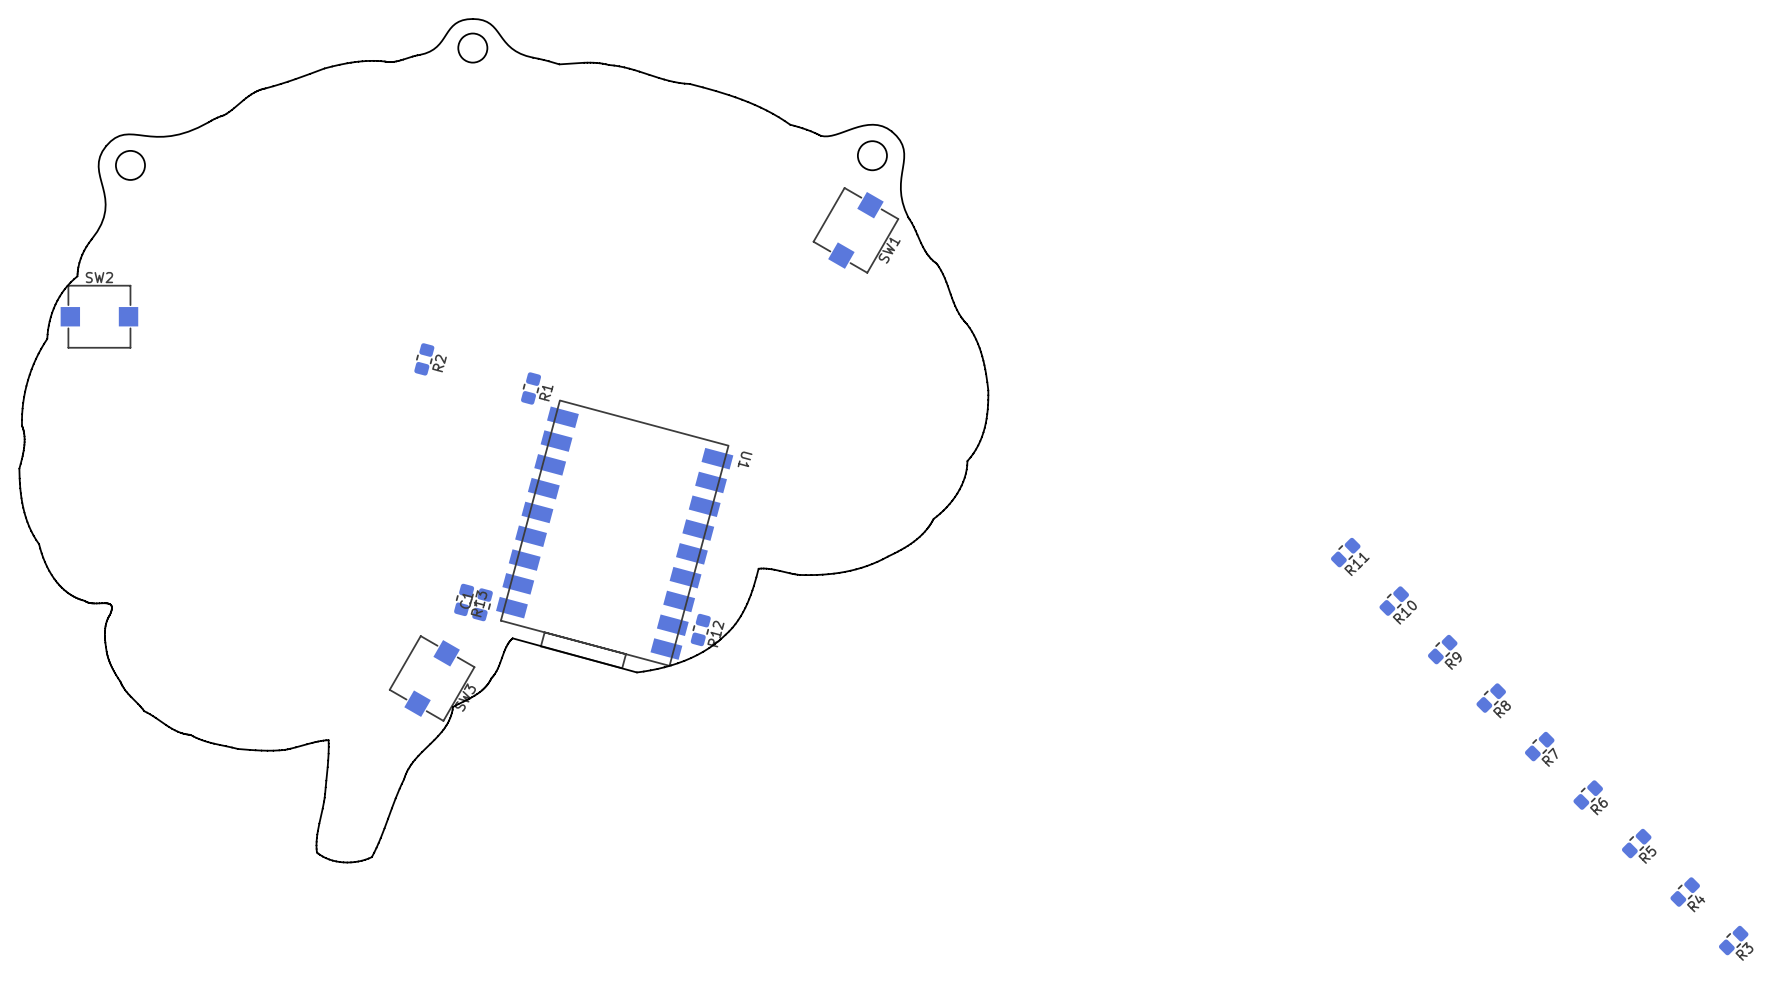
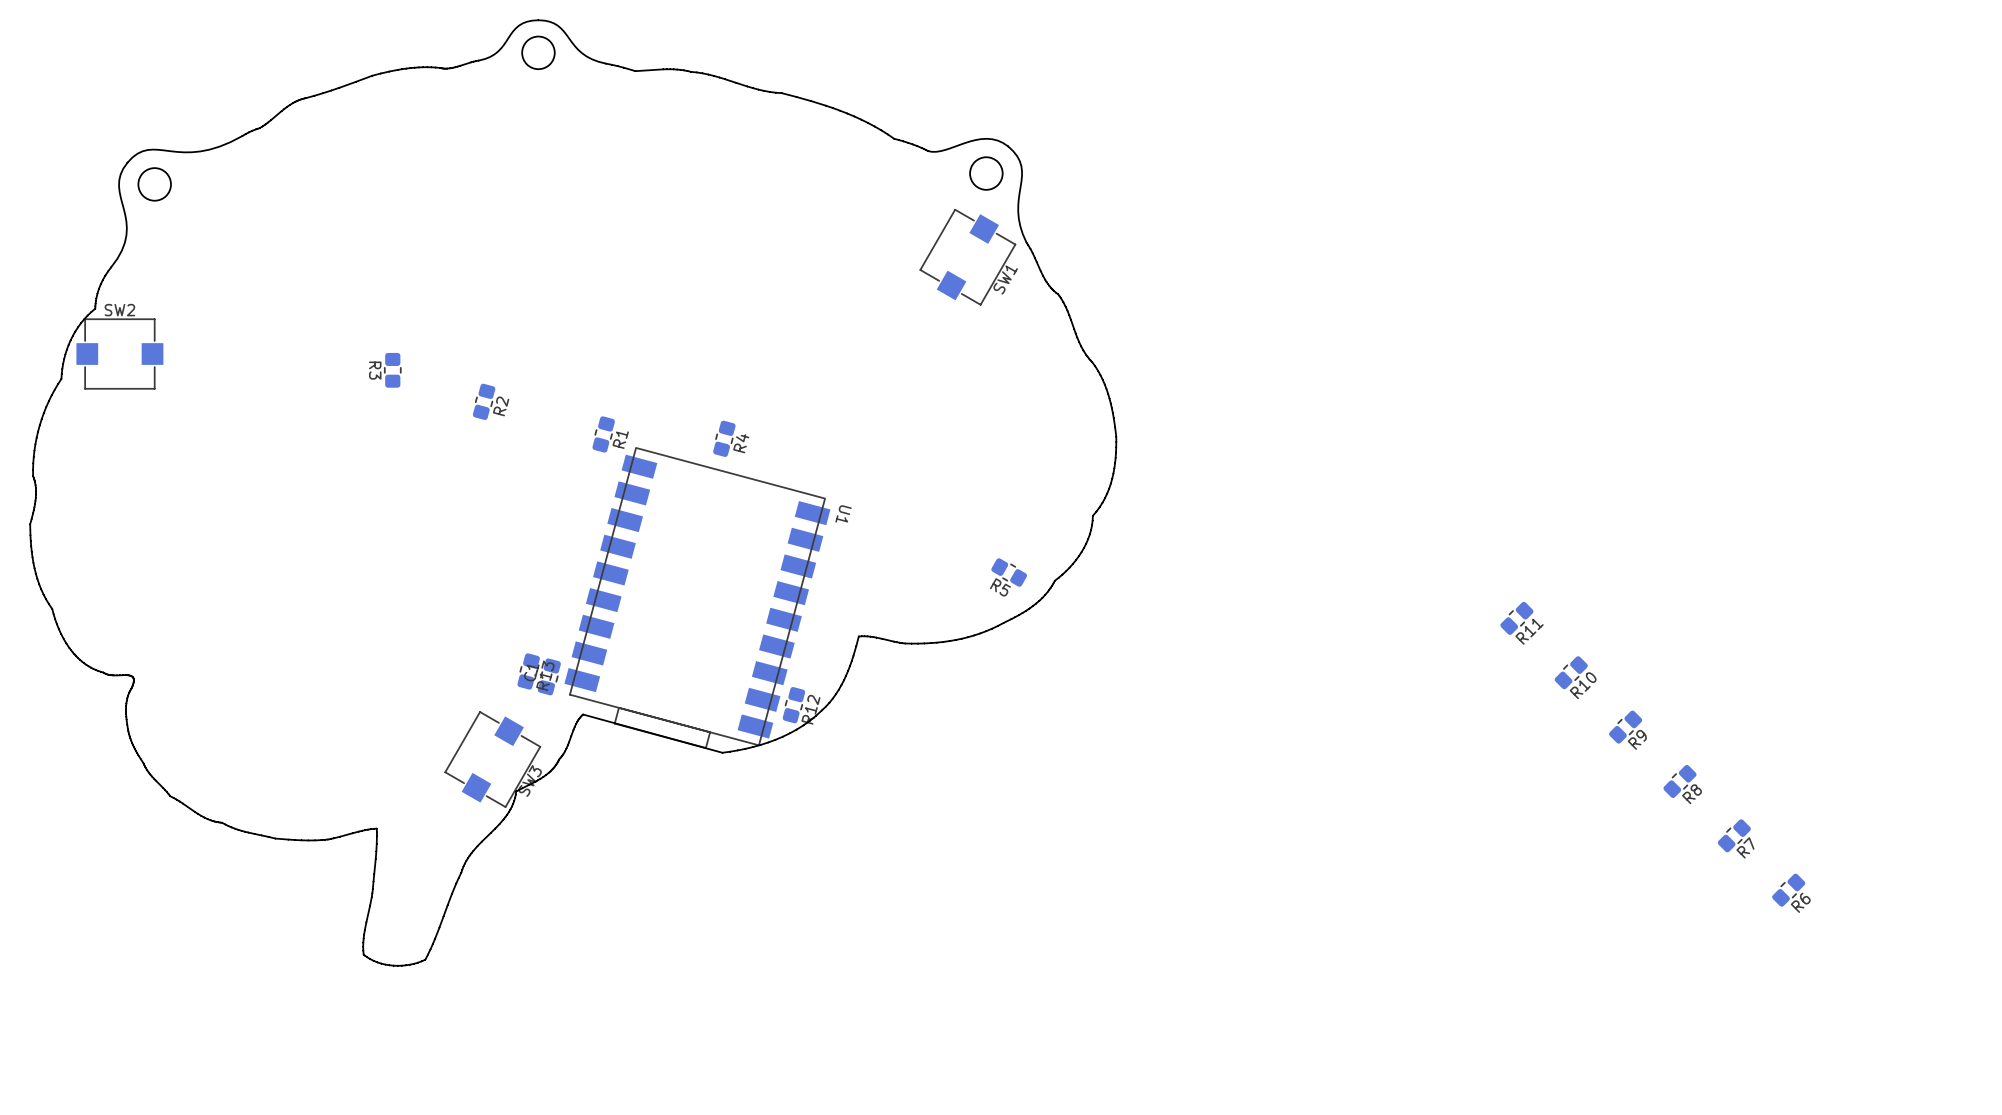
R5 rotation: 0° (1636, 843) -> 75° clockwise (1009, 572)
R5 position: (1636, 843) -> (1009, 572)
R4 rotation: 0° (1685, 892) -> 30° counterclockwise (724, 438)
R4 position: (1685, 892) -> (724, 438)
R3 rotation: 0° (1733, 940) -> 45° counterclockwise (392, 370)
R3 position: (1733, 940) -> (392, 370)
R3 name position: R3 (1744, 951) -> R3 (375, 370)

